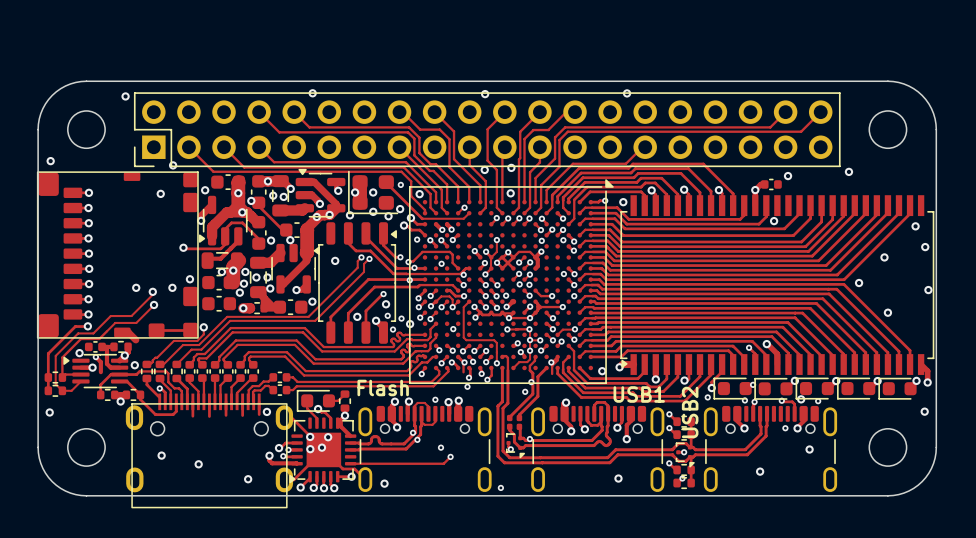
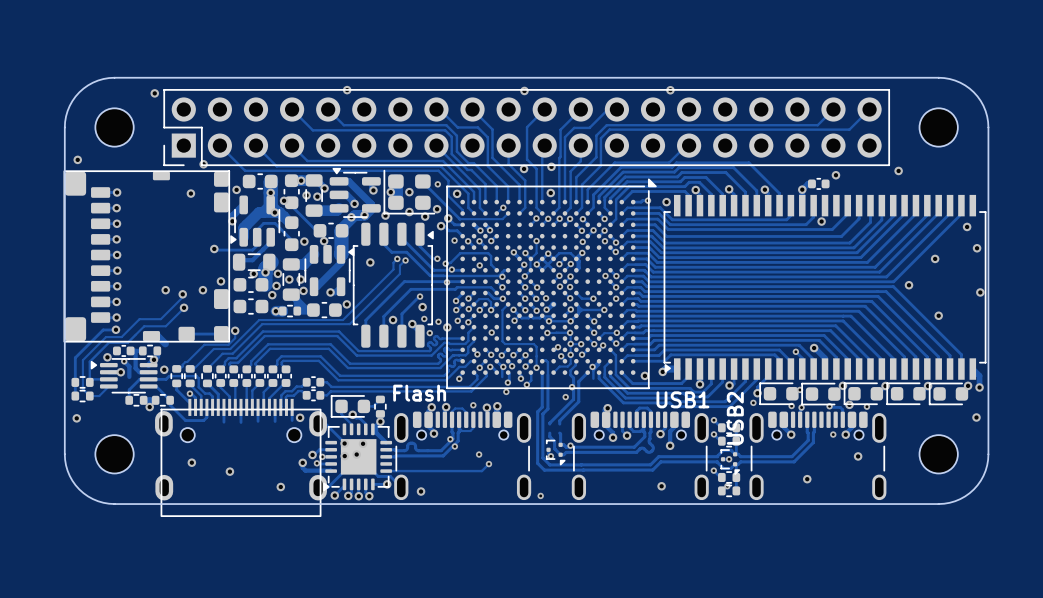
part: (509, 422) -> none
part: (519, 422) -> none

